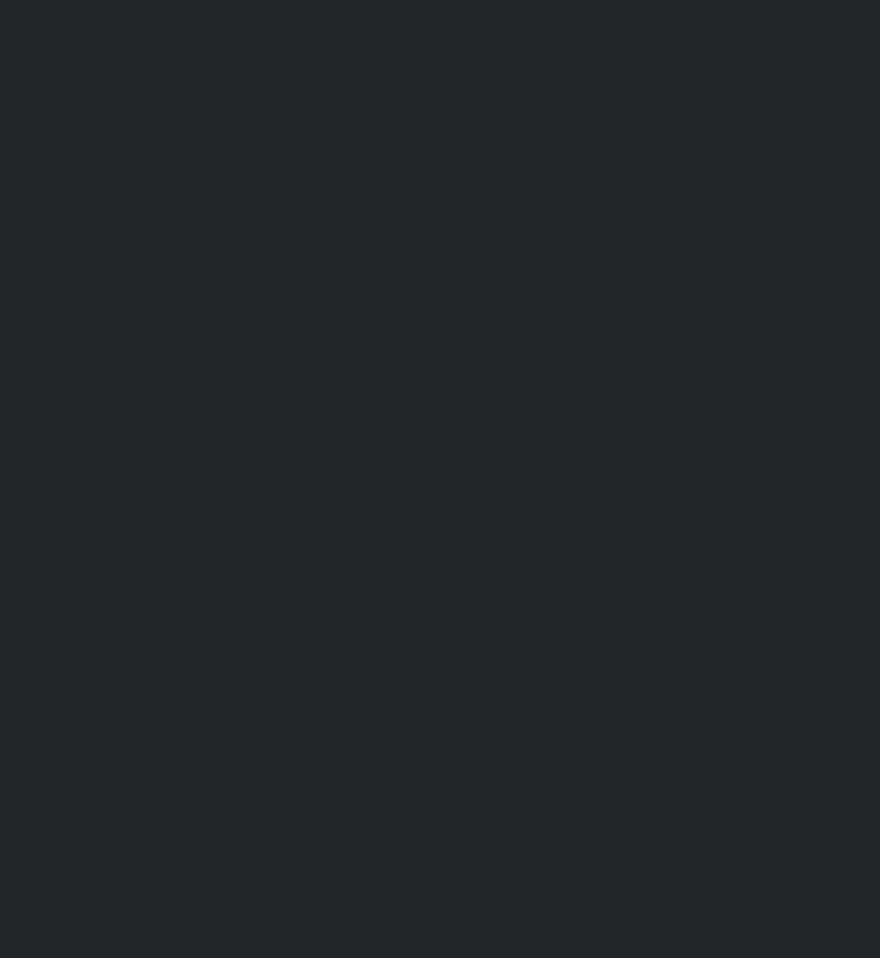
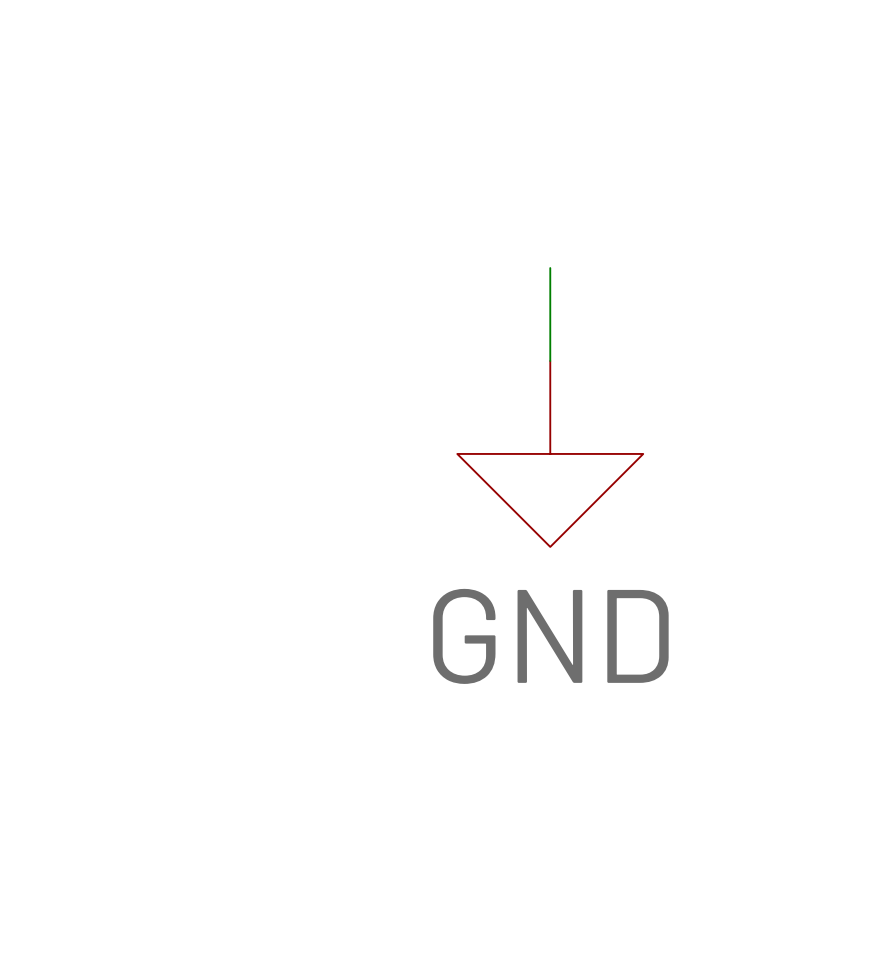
wire: none -> (550, 268) (550, 361)
power symbol: none -> GND (550, 453)

